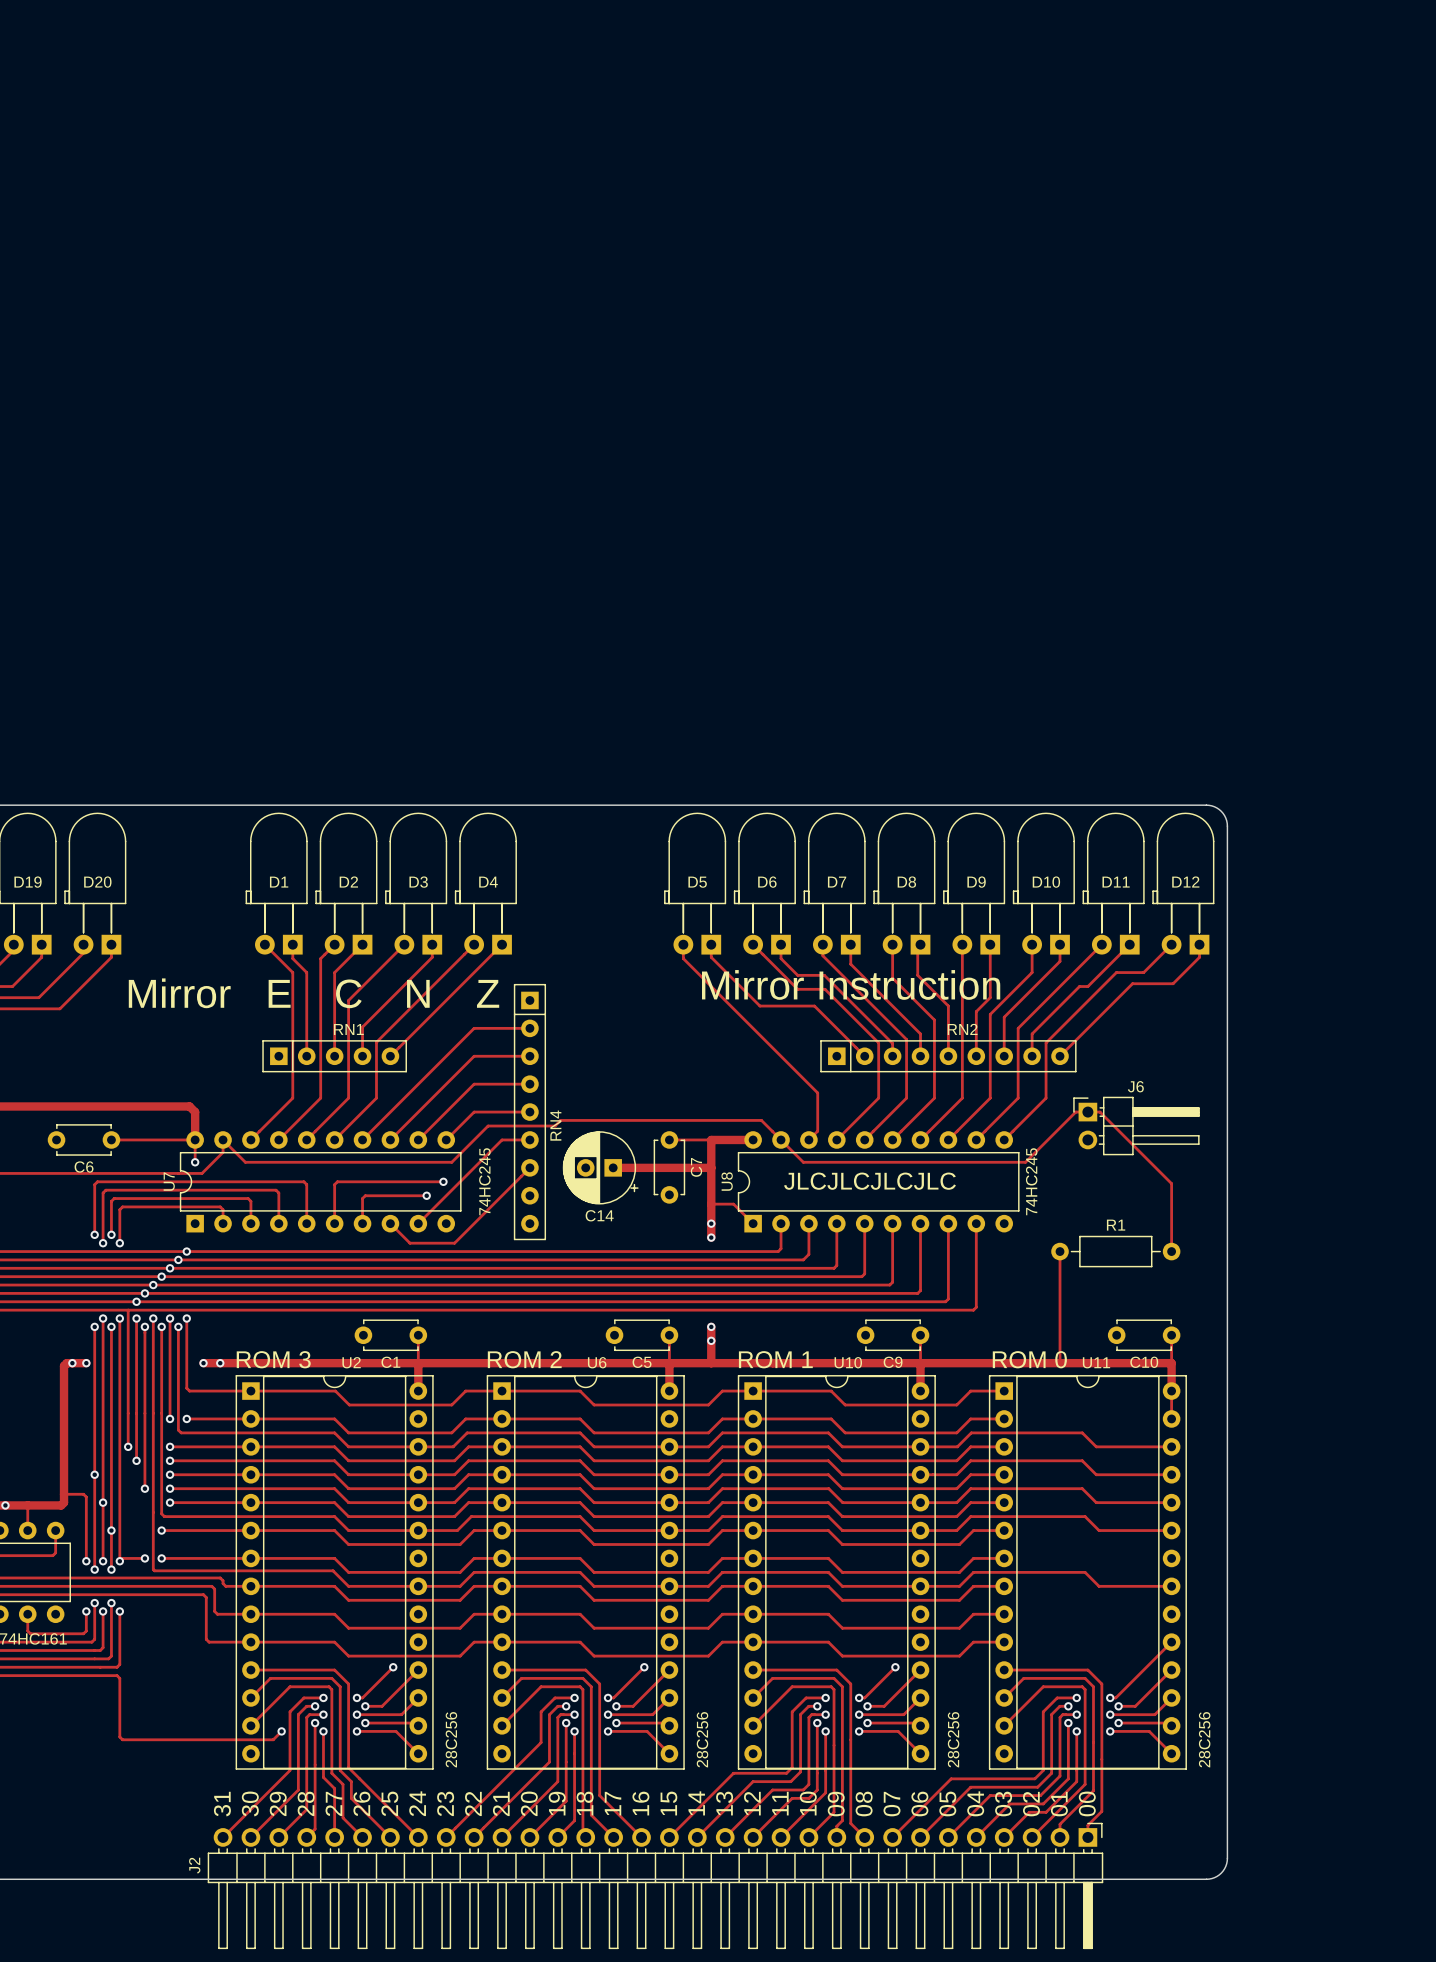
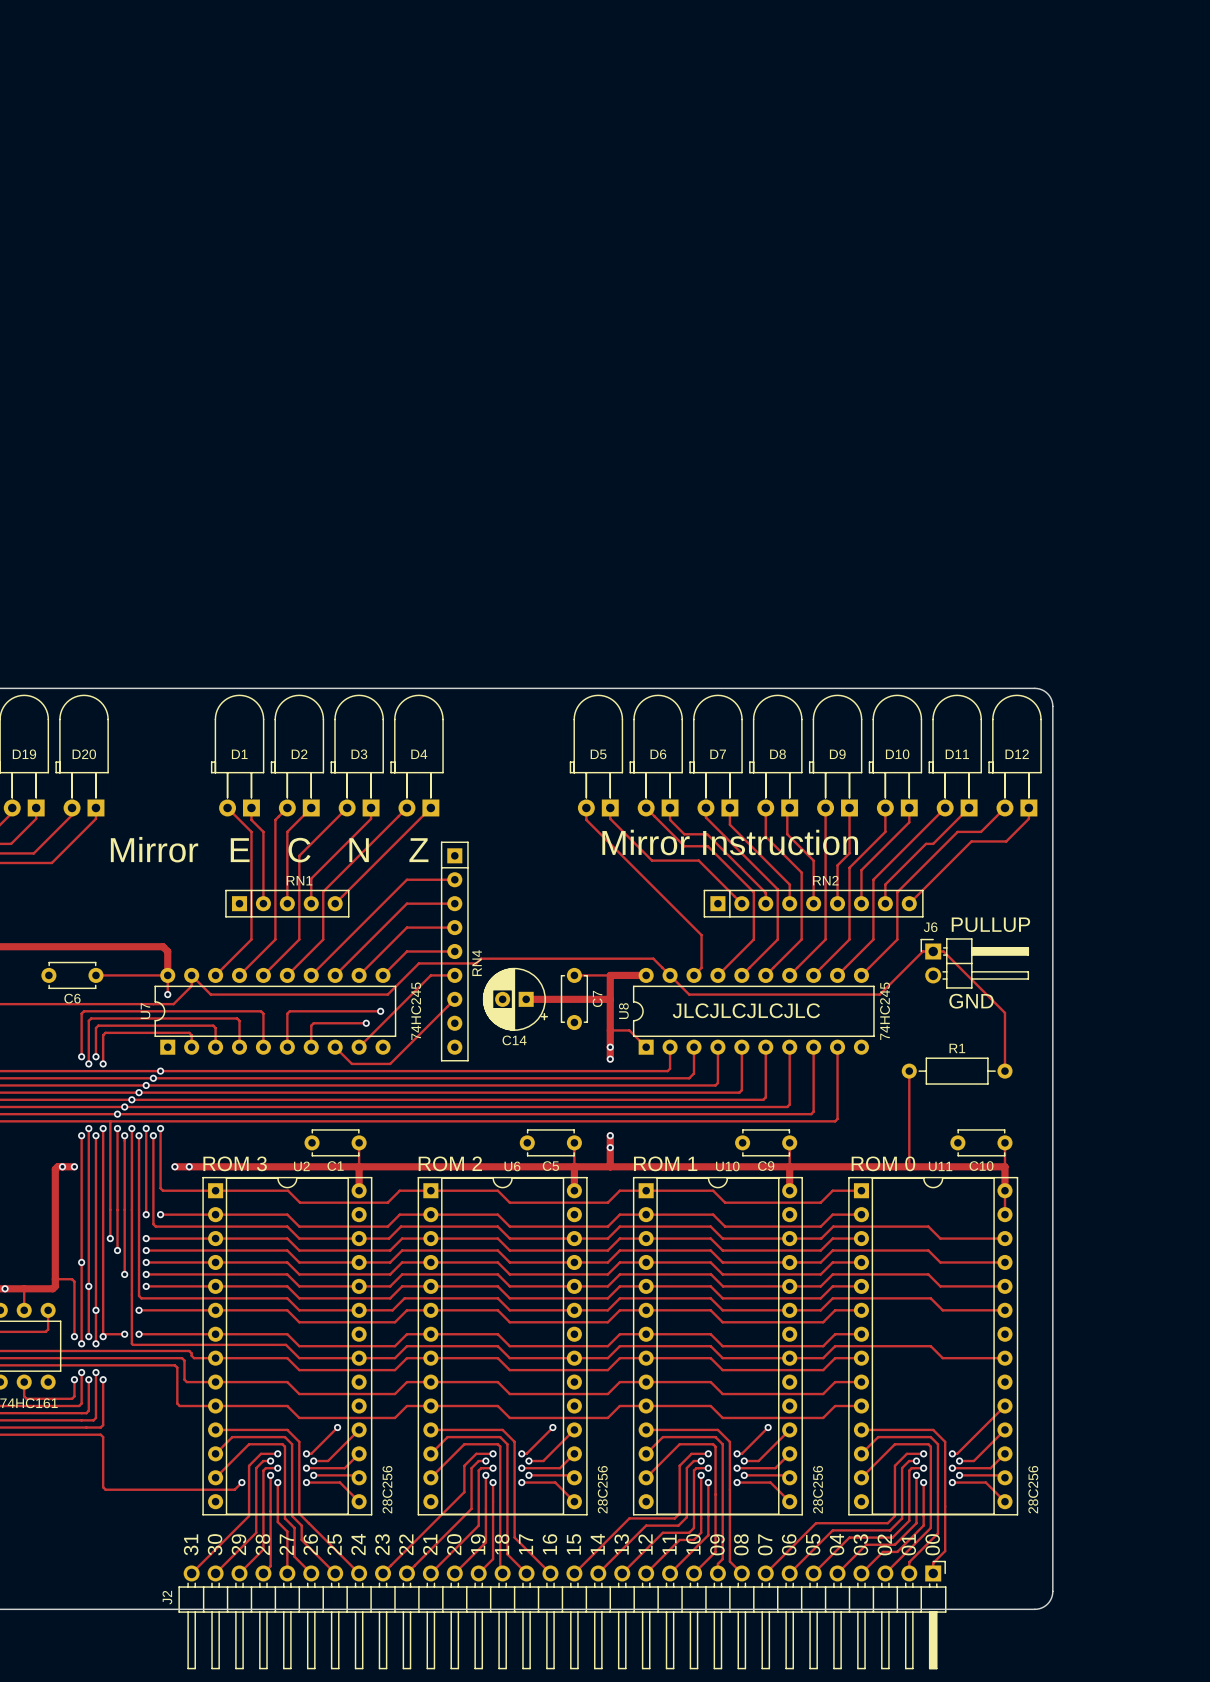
text: none -> PULLUP (990, 924)
J6 name position: J6 (1135, 1086) -> J6 (930, 927)
text: none -> GND (971, 1001)

